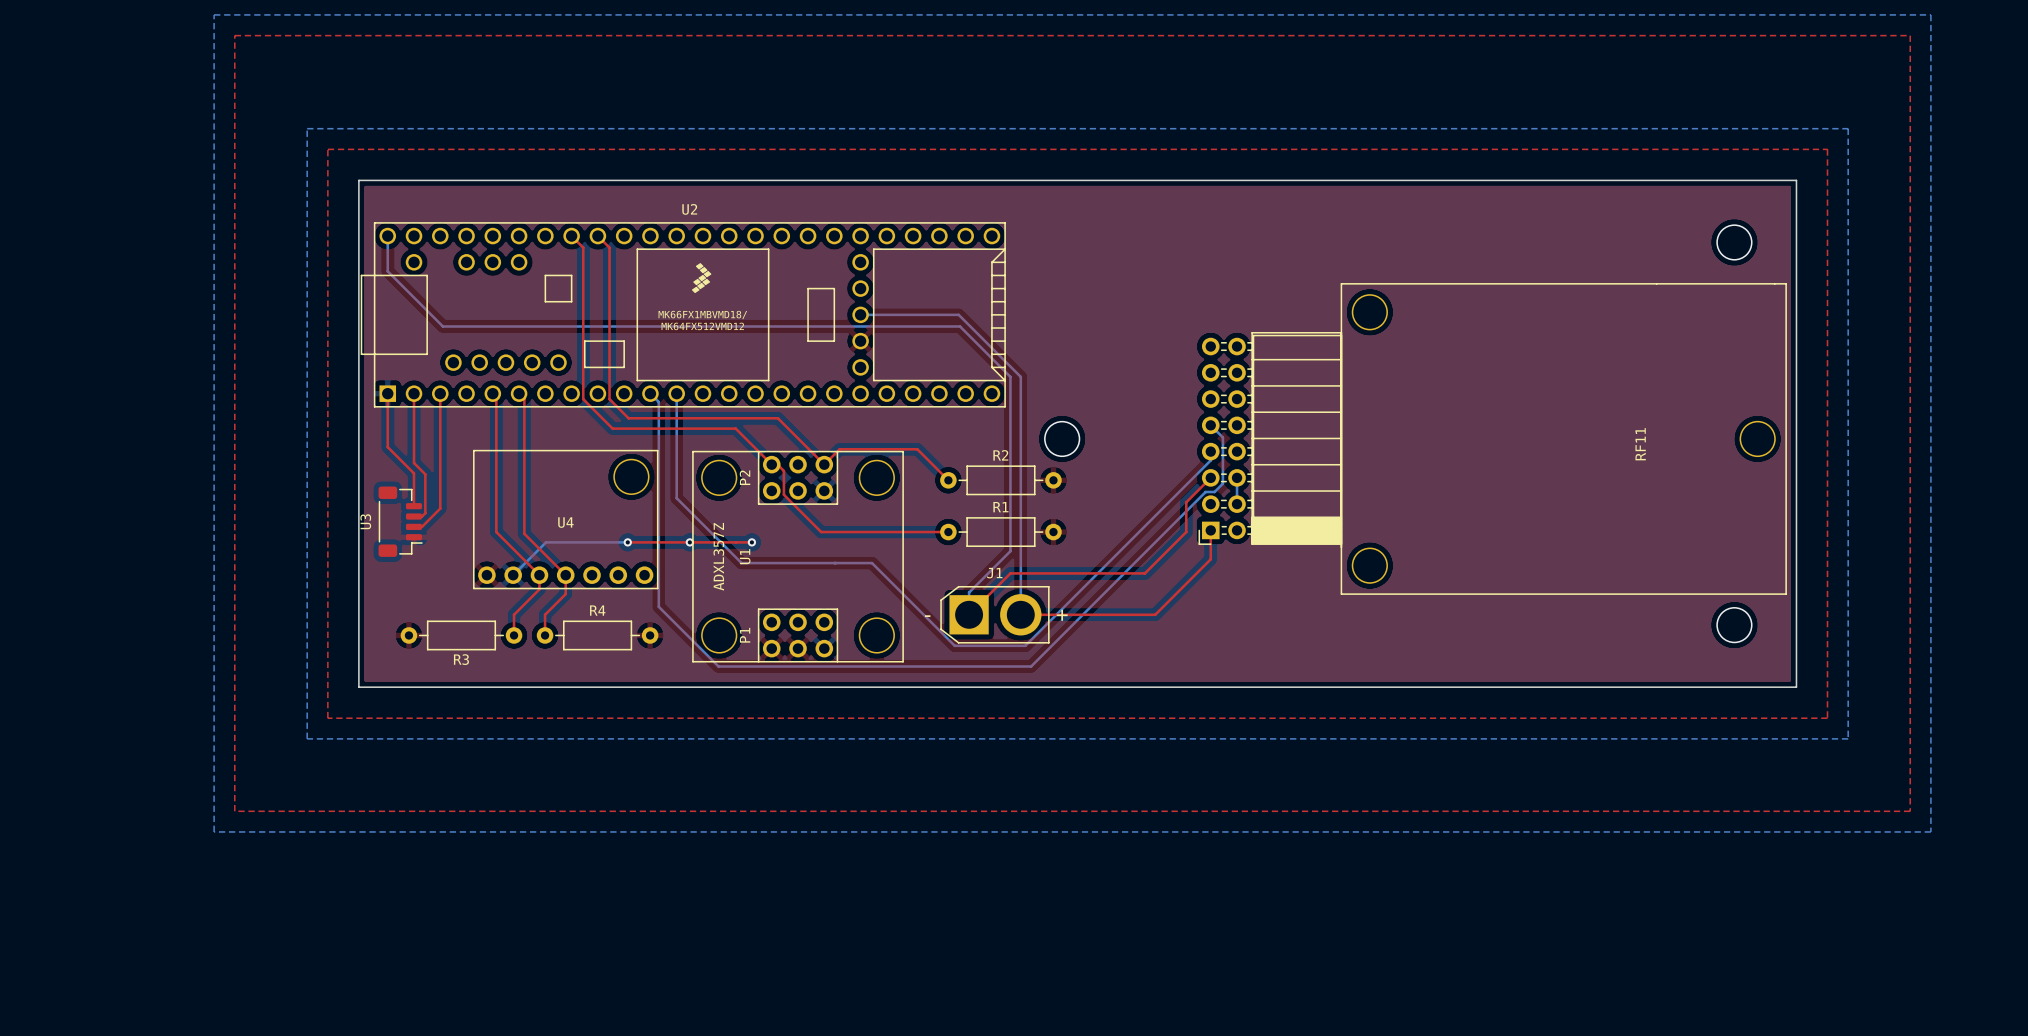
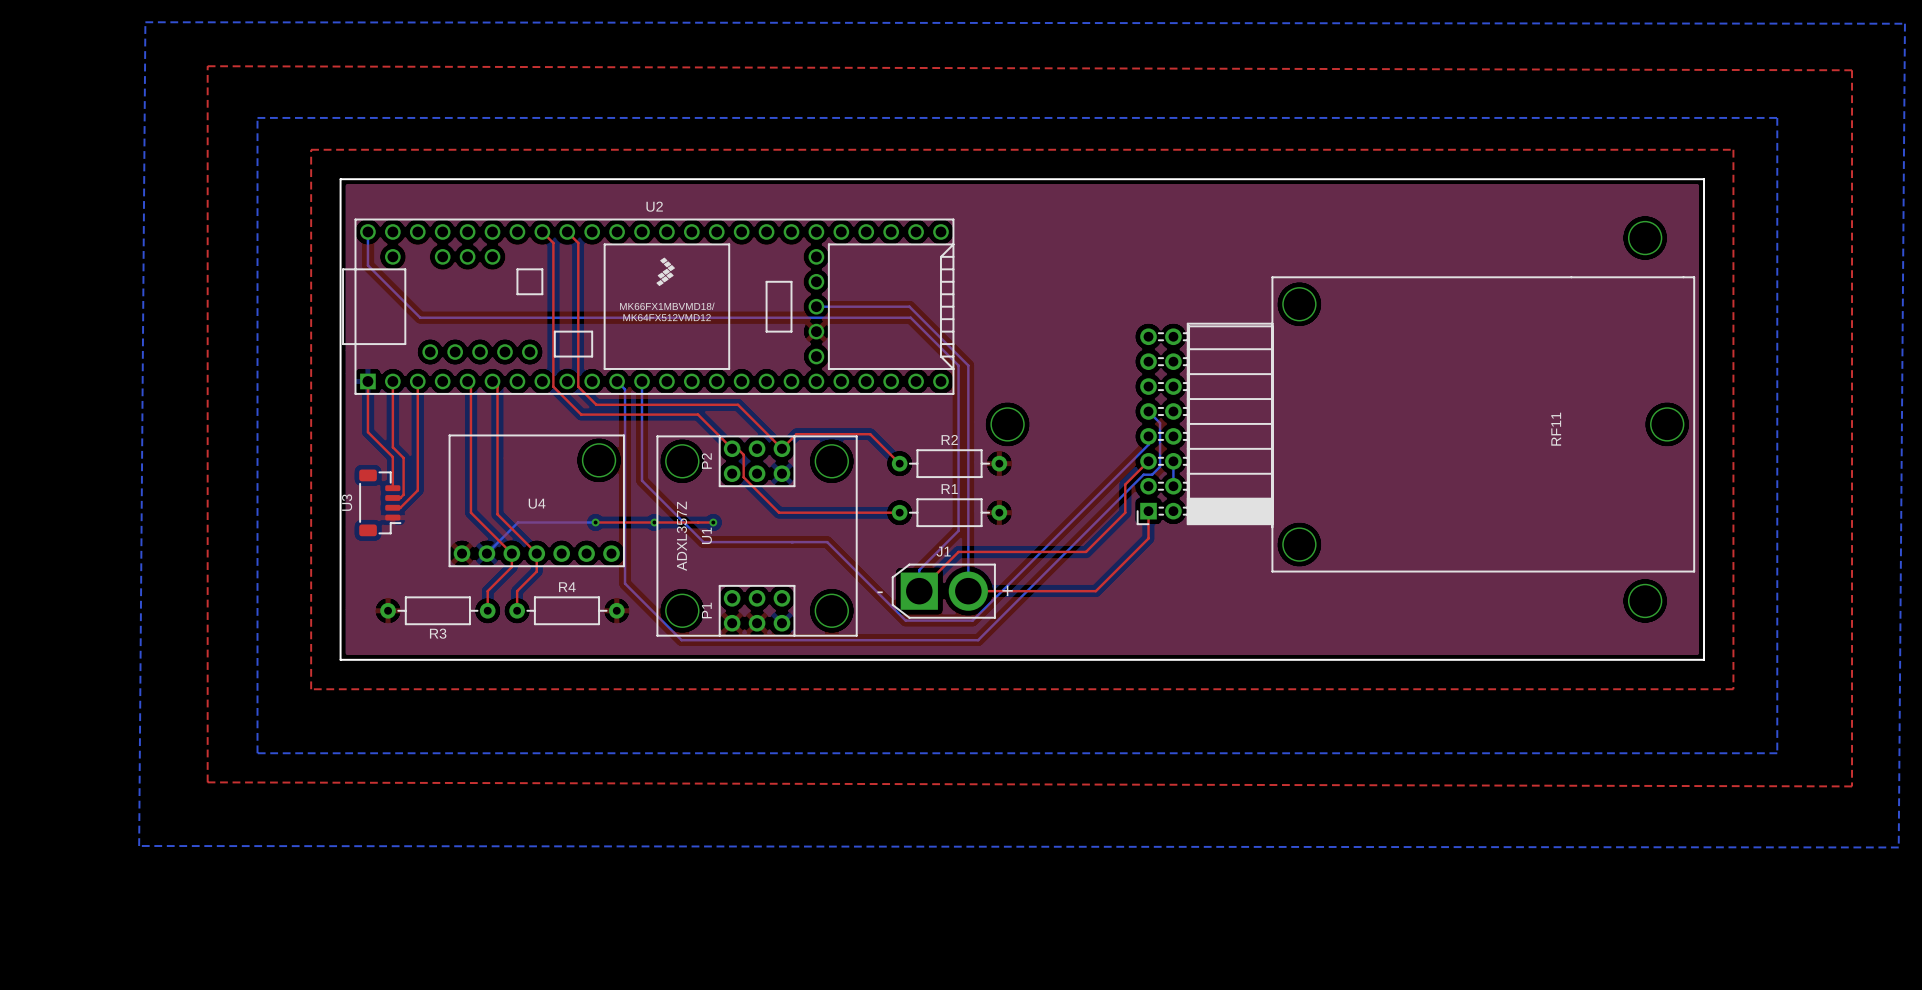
bottom zone outline: (214, 14) (214, 831) (1930, 831) (1930, 14) (214, 14) -> (145, 22) (139, 845) (1898, 847) (1904, 23) (145, 22)
top zone outline: (234, 35) (234, 811) (1910, 811) (1910, 35) (234, 35) -> (207, 66) (207, 782) (1852, 786) (1852, 70) (207, 66)
bottom zone outline: (307, 128) (307, 738) (1848, 738) (1848, 128) (307, 128) -> (257, 117) (257, 753) (1777, 753) (1777, 117) (257, 117)

